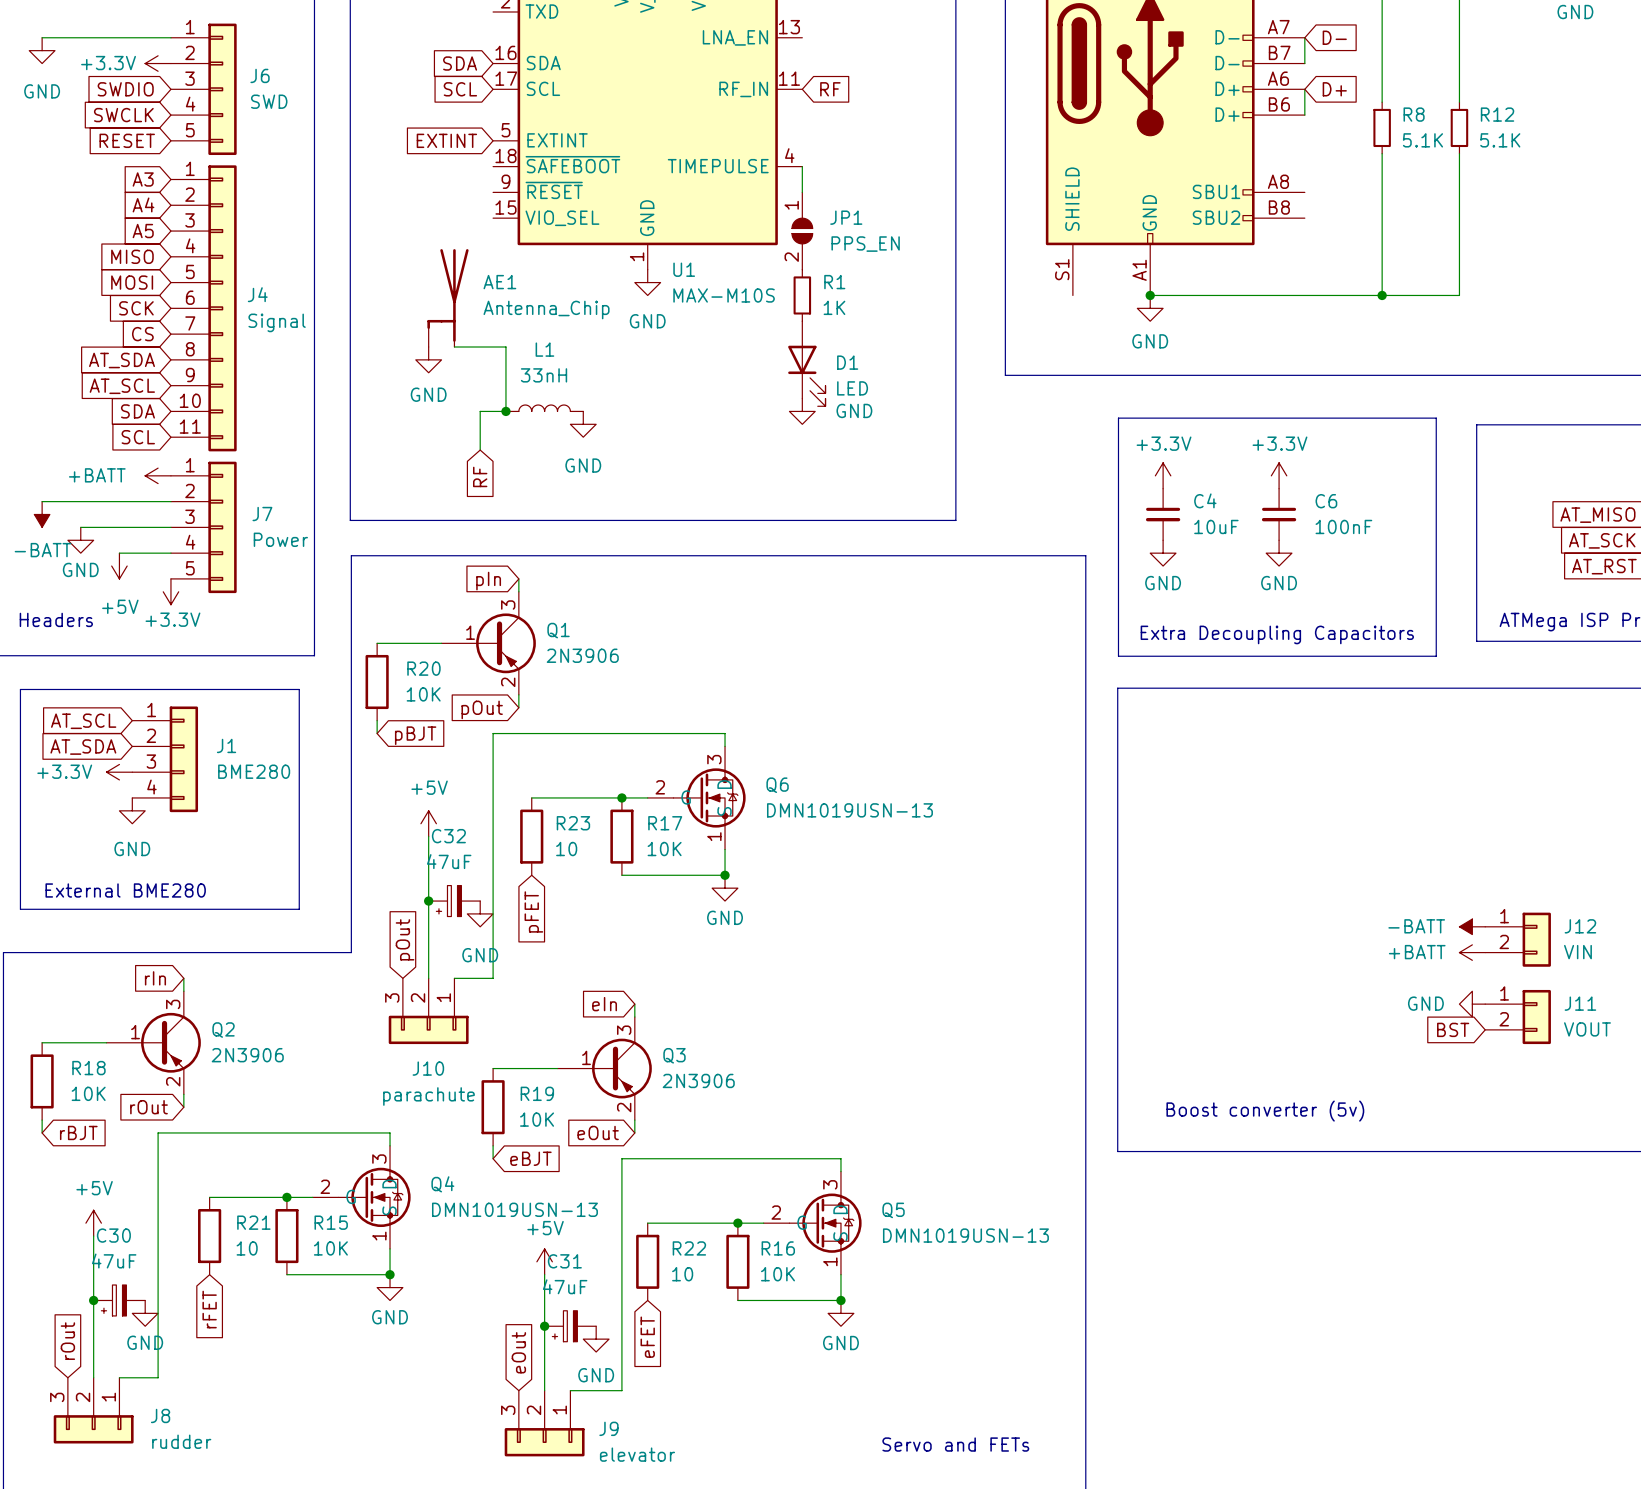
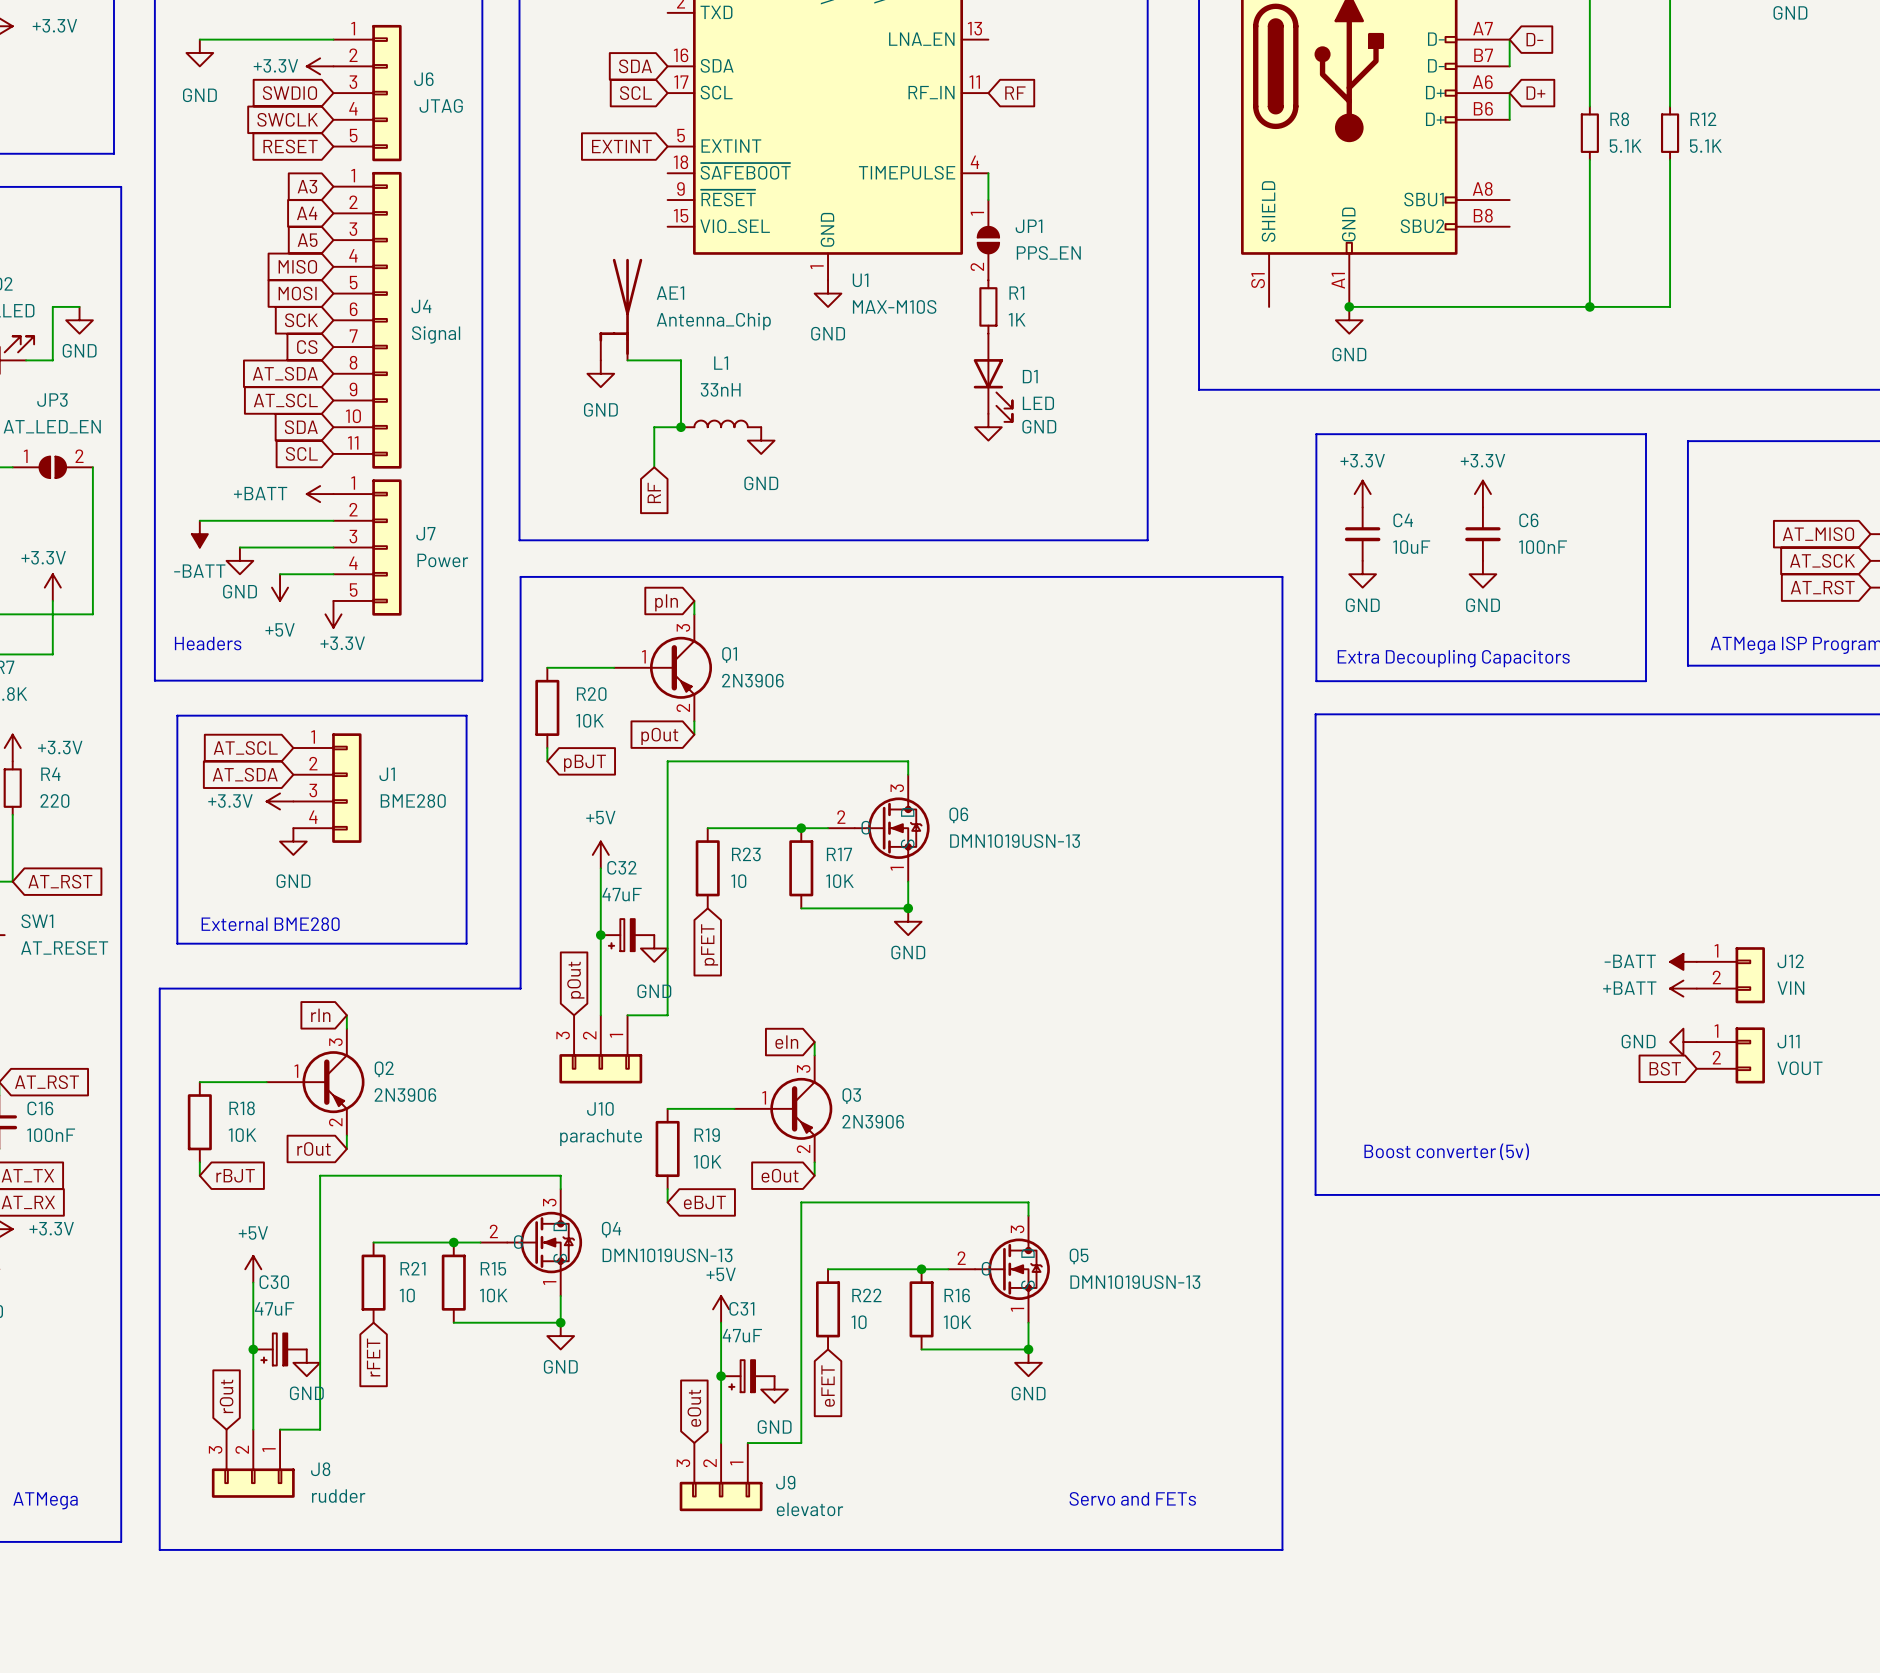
J6 value: SWD (269, 101) -> JTAG (441, 105)

